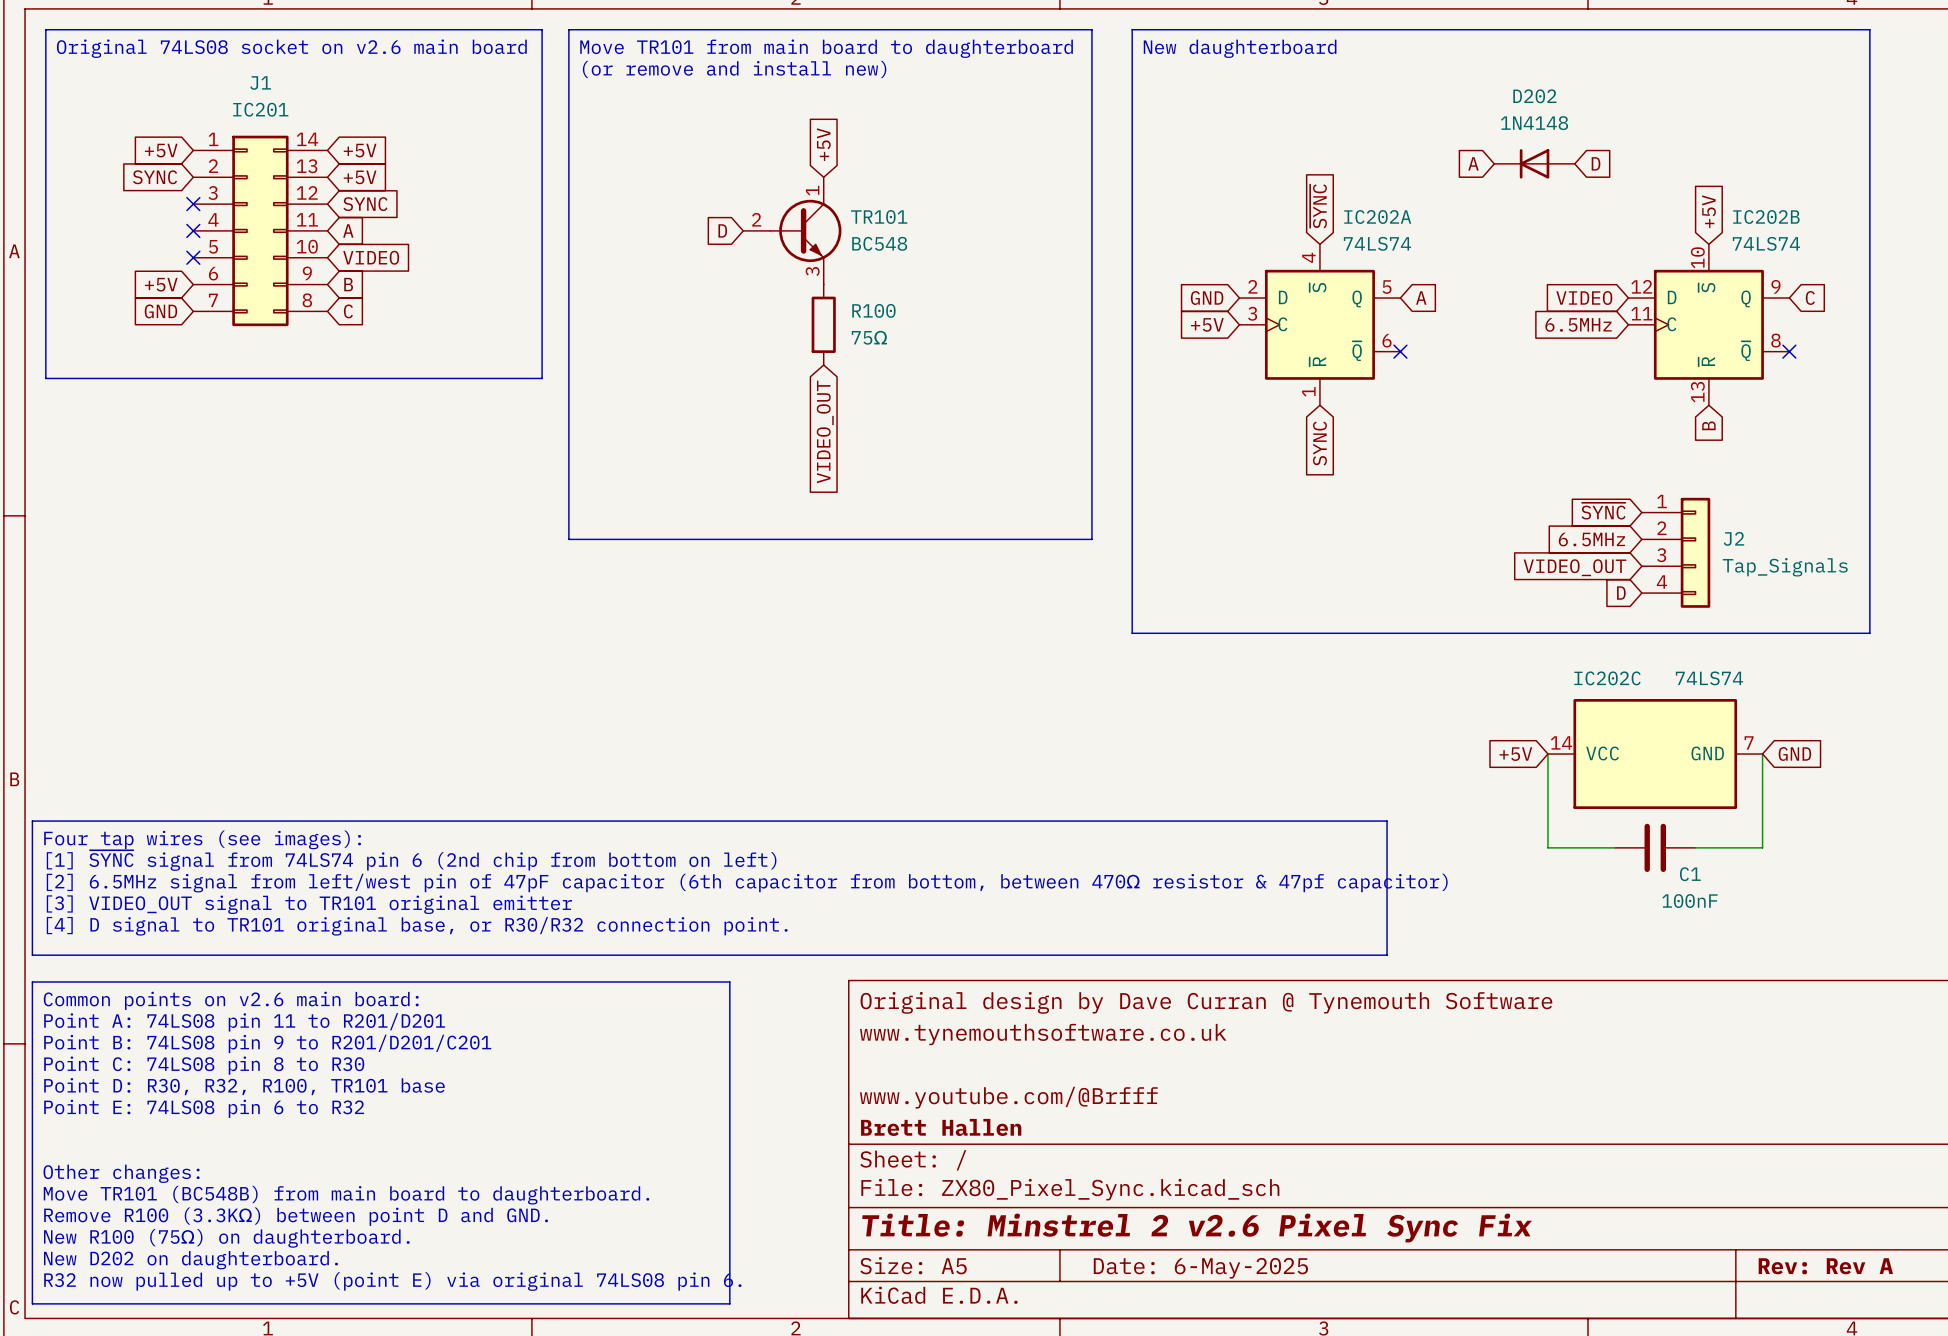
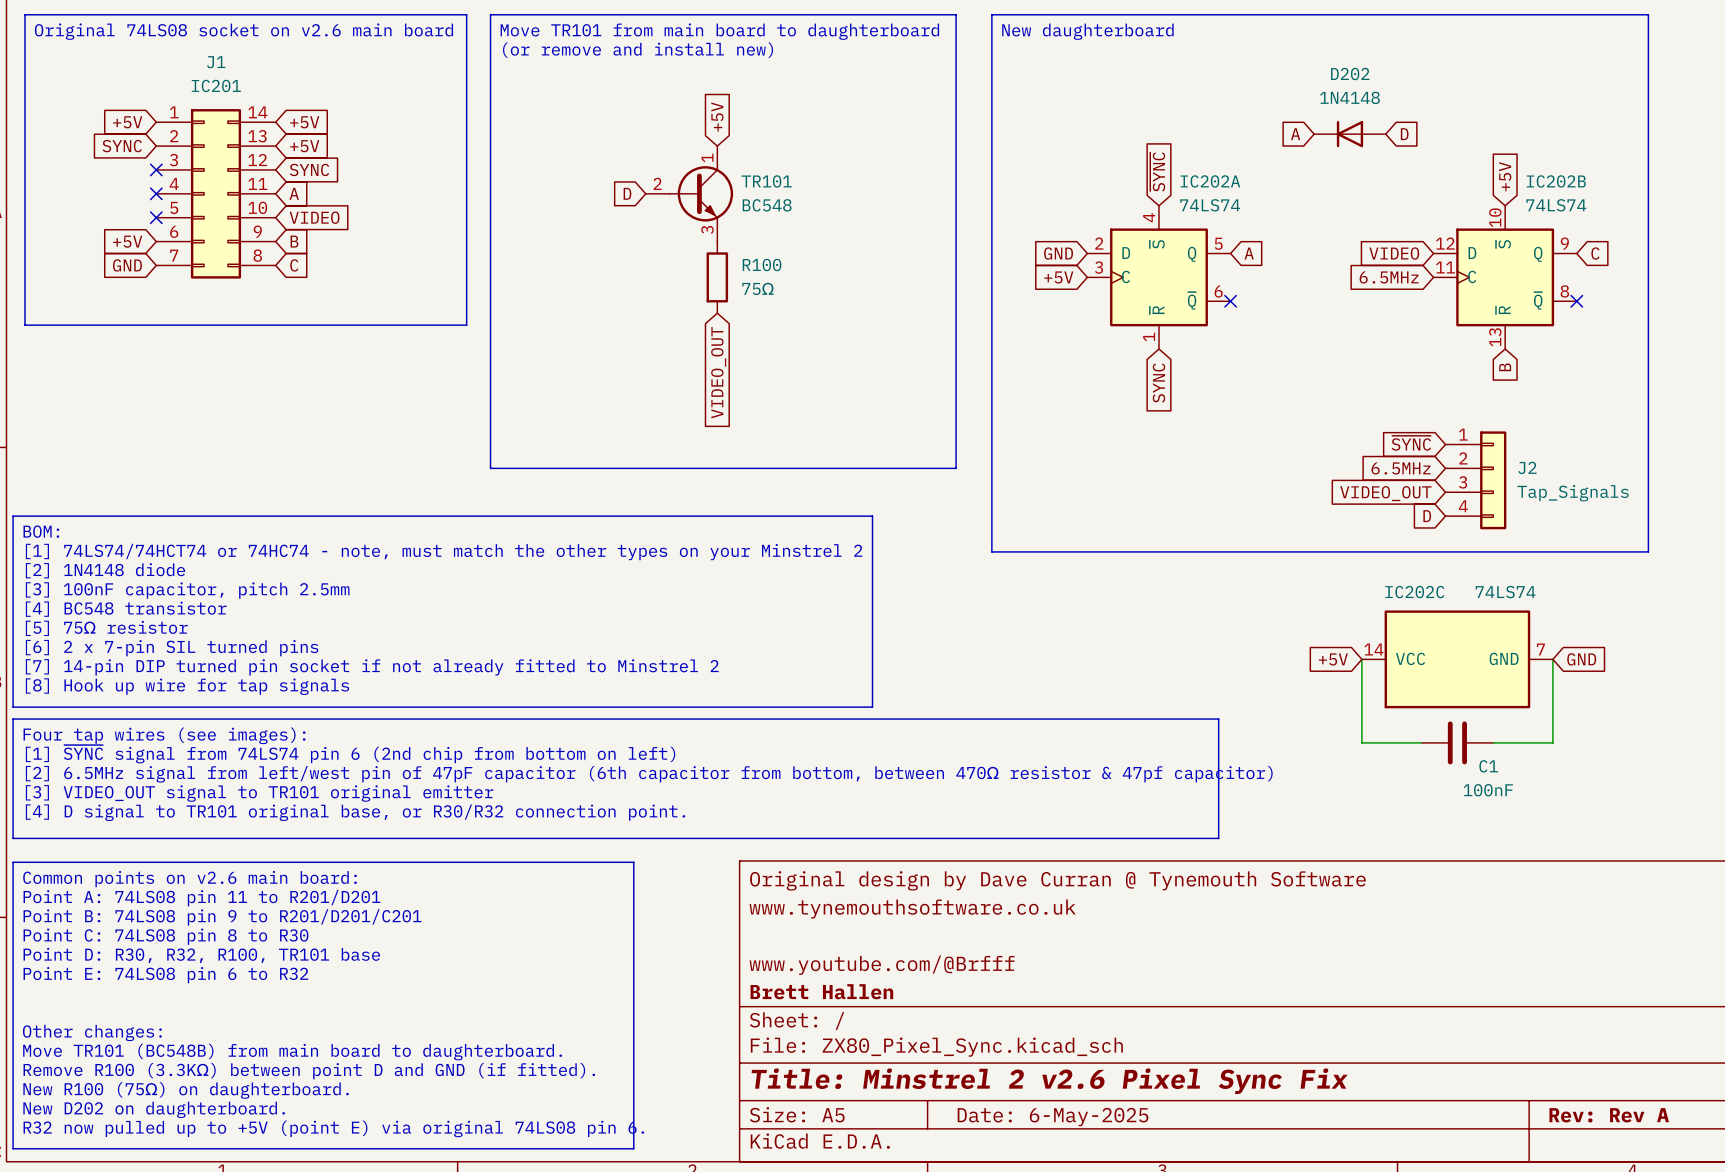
line: none -> (13, 516) (872, 516) (872, 707) (13, 707) (13, 516)
text: none -> BOM: (41, 531)
text: none -> [1] 74LS74/74HCT74 or 74HC74 - note, must match the other types on your Minstrel 2 (444, 552)
text: none -> [2] 1N4148 diode (105, 570)
text: none -> [3] 100nF capacitor, pitch 2.5mm (187, 590)
text: none -> [4] BC548 transistor (126, 609)
text: none -> [5] 75Ω resistor (106, 628)
text: none -> [6] 2 x 7-pin SIL turned pins (172, 648)
text: none -> [7] 14-pin DIP turned pin socket if not already fitted to Minstrel 2 (372, 667)
text: none -> [8] Hook up wire for tap signals (187, 686)
text: Remove R100 (3.3KΩ) between point D and GND. (296, 1216) -> Remove R100 (3.3KΩ) between point D and GND (if fitted). (309, 1071)

